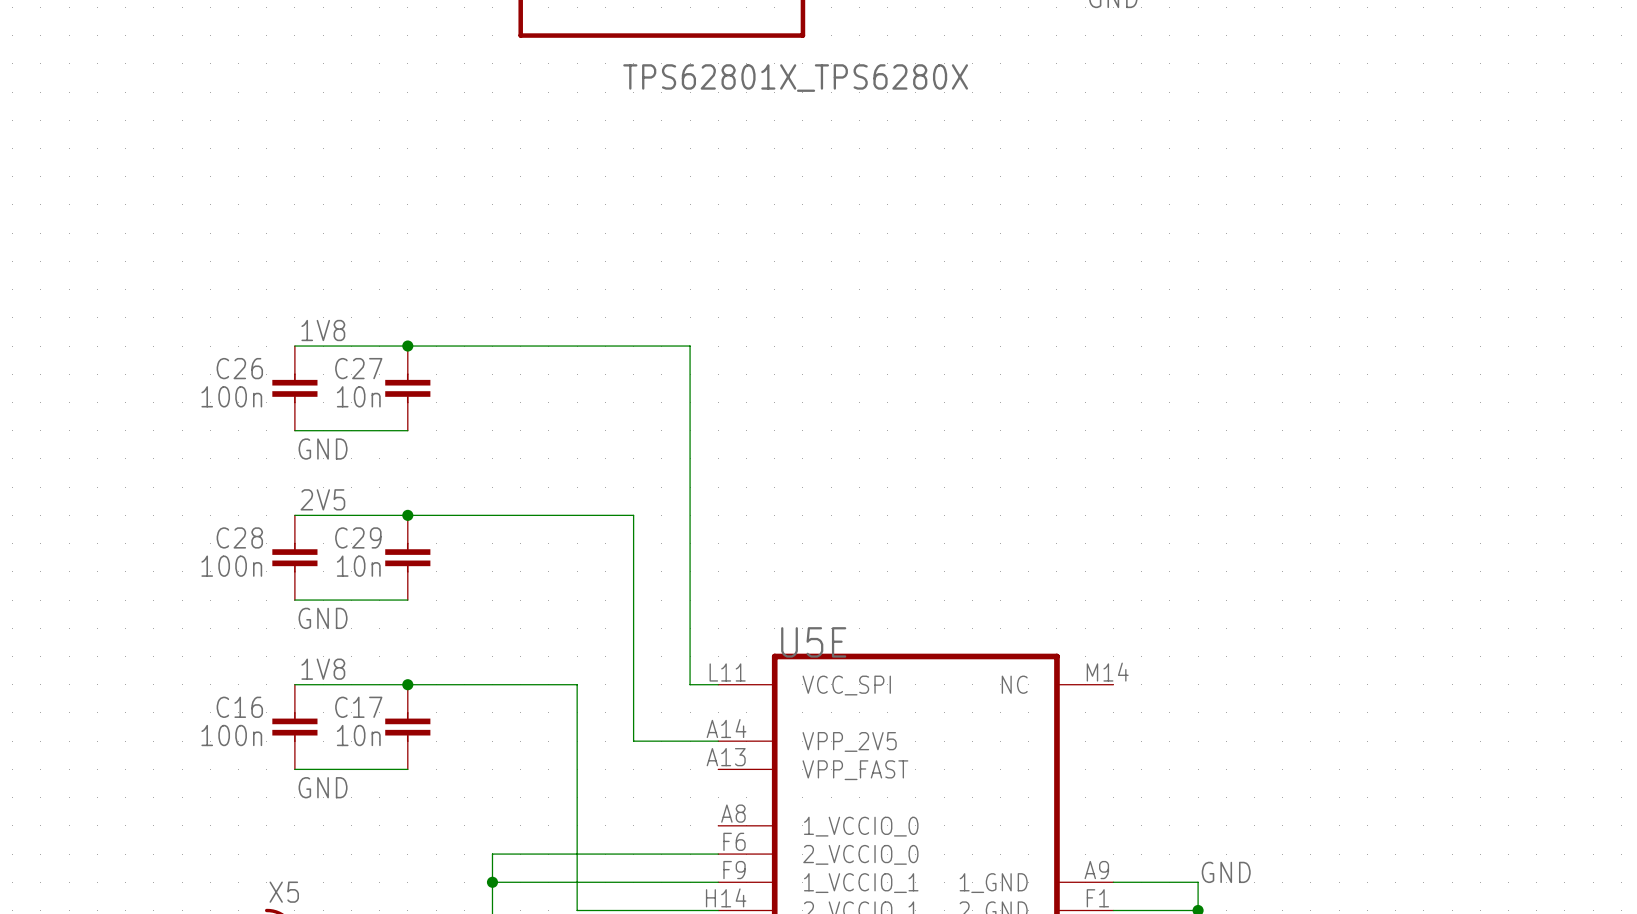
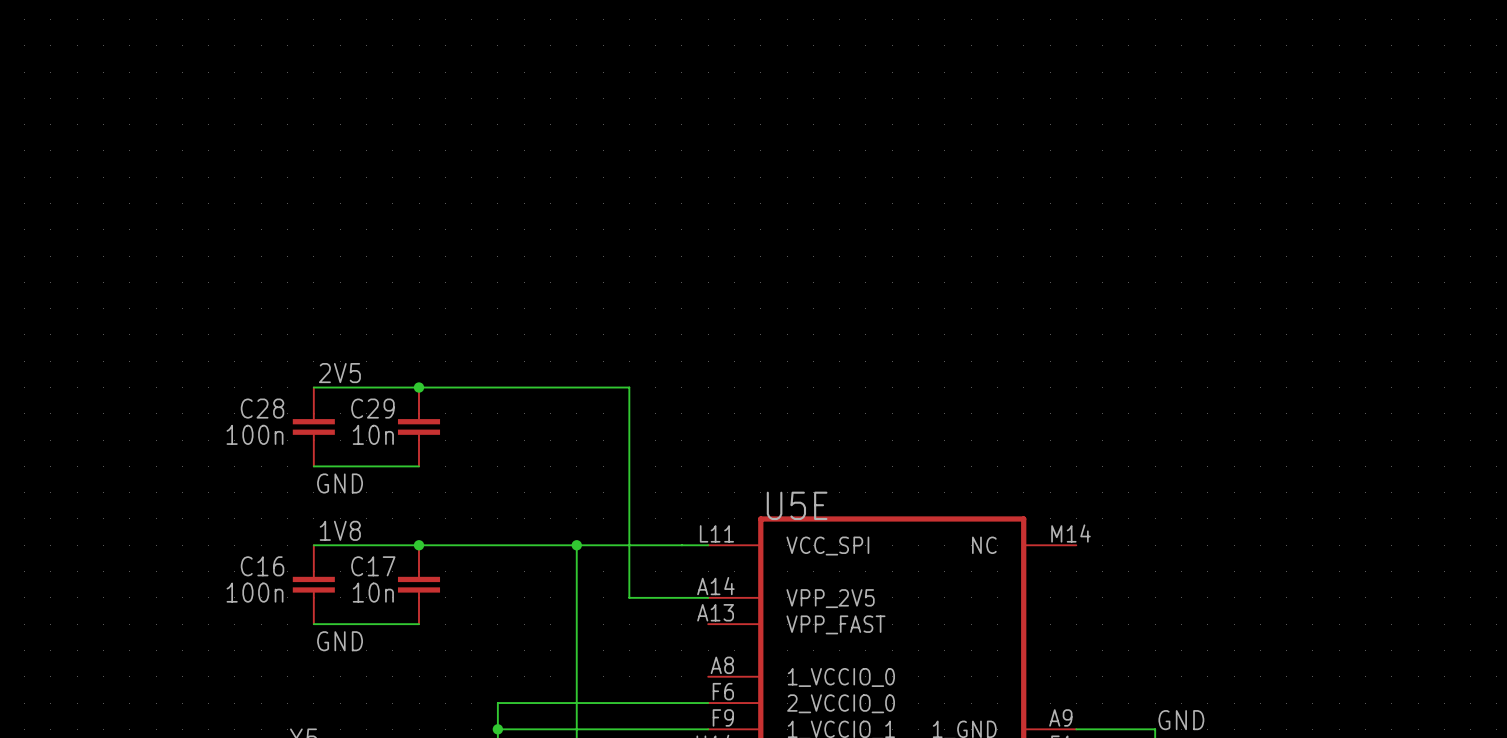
label: 1V8 (323, 330) -> none
wire: (294, 346) (690, 346) (690, 684) -> (576, 545) (681, 545)
junction: (407, 346) -> none
C26: 100n (294, 388) -> none
C27: 10n (407, 388) -> none
wire: (294, 430) (407, 430) -> none
label: GND (323, 449) -> none
junction: none -> (576, 545)

